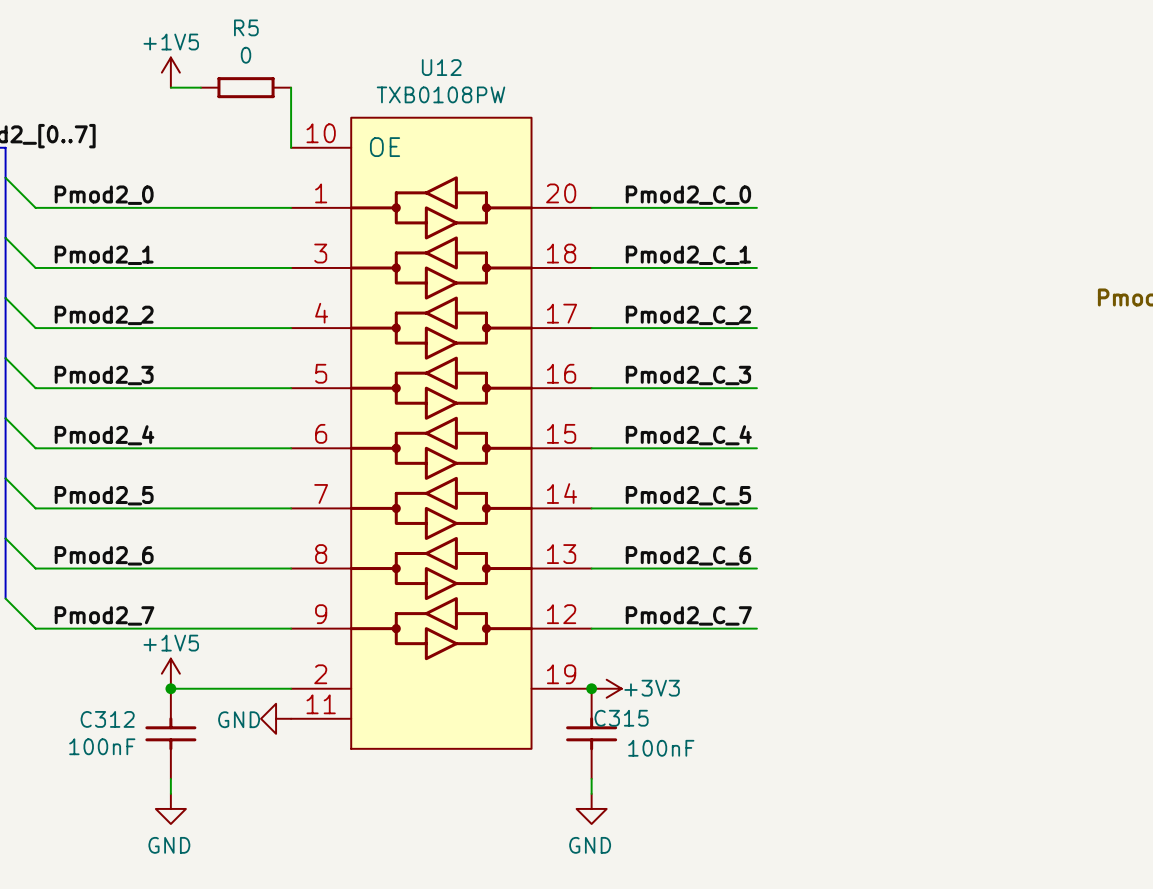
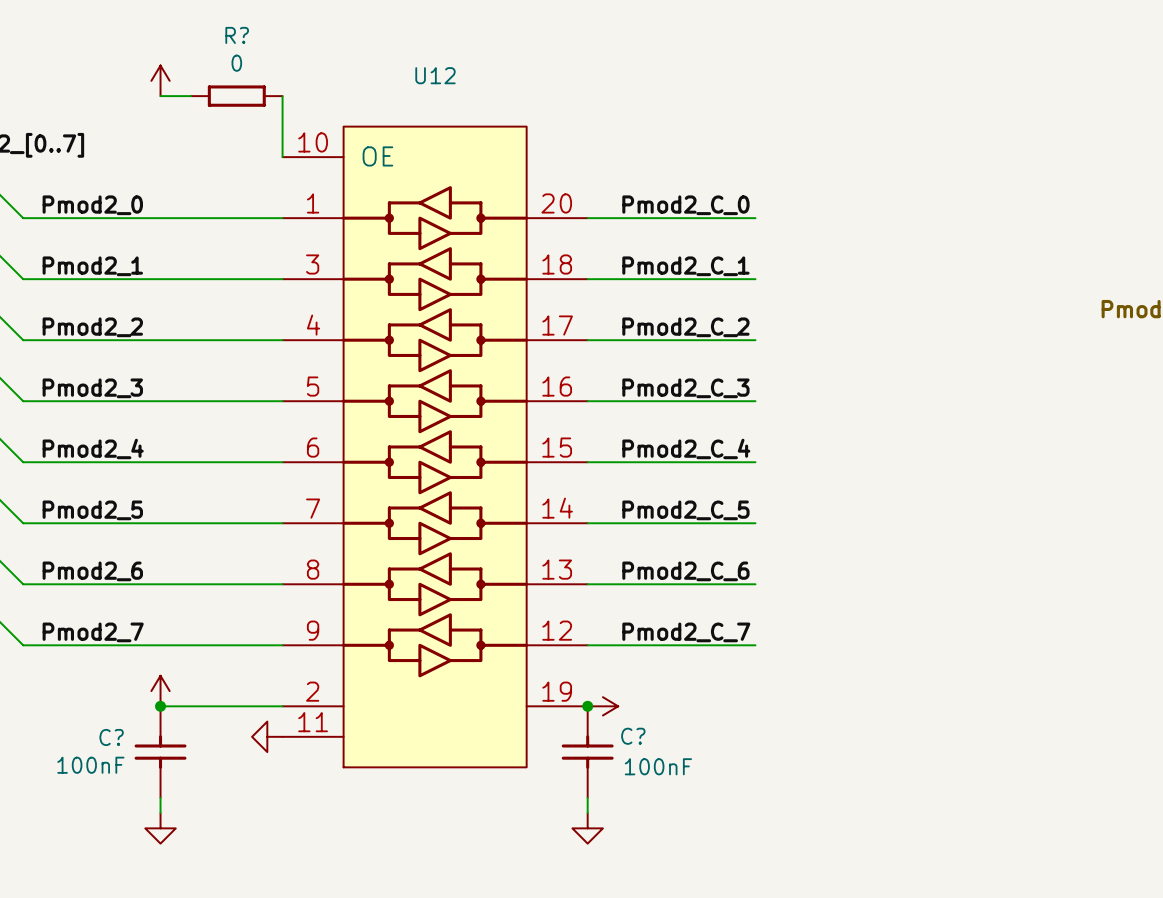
R5 name: R5 (246, 27) -> R? (237, 35)
power symbol text: +1V5 (171, 42) -> none
U12 value: TXB0108PW (441, 94) -> none
power symbol text: +1V5 (171, 643) -> none
power symbol text: +3V3 (652, 688) -> none
C315 name: C315 (621, 718) -> C? (633, 736)
C312 name: C312 (107, 719) -> C? (111, 737)
power symbol text: GND (239, 719) -> none
power symbol text: GND (169, 845) -> none
power symbol text: GND (590, 845) -> none

